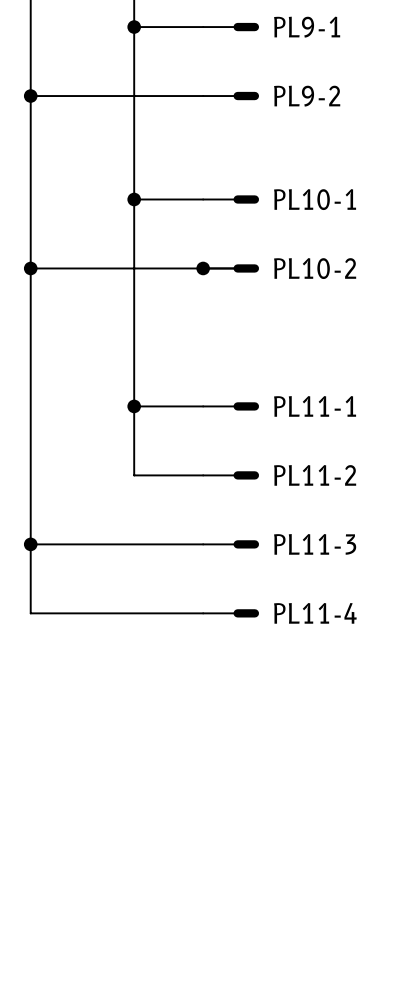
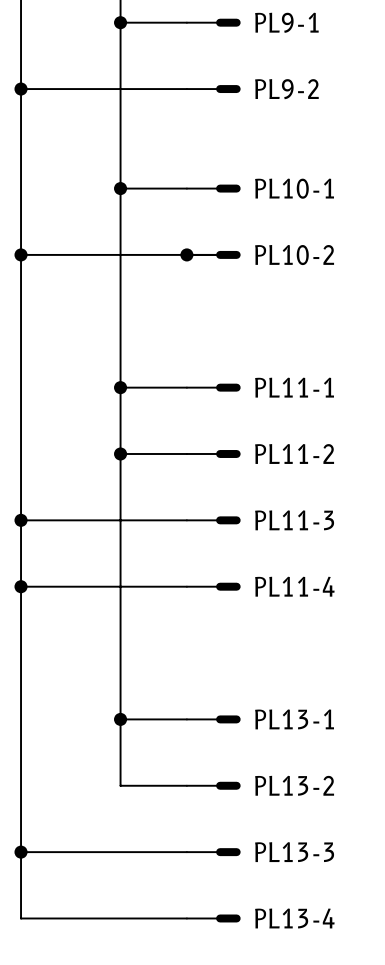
wire: none -> (120, 453) (120, 785) (186, 785)
junction: none -> (120, 453)
wire: none -> (21, 586) (21, 918) (186, 918)
junction: none -> (21, 586)
wire: none -> (120, 719) (186, 719)
junction: none -> (120, 719)
PL13-1: none -> (213, 719)
PL13-2: none -> (213, 785)
wire: none -> (21, 852) (186, 852)
junction: none -> (21, 852)
PL13-3: none -> (213, 852)
PL13-4: none -> (213, 918)

